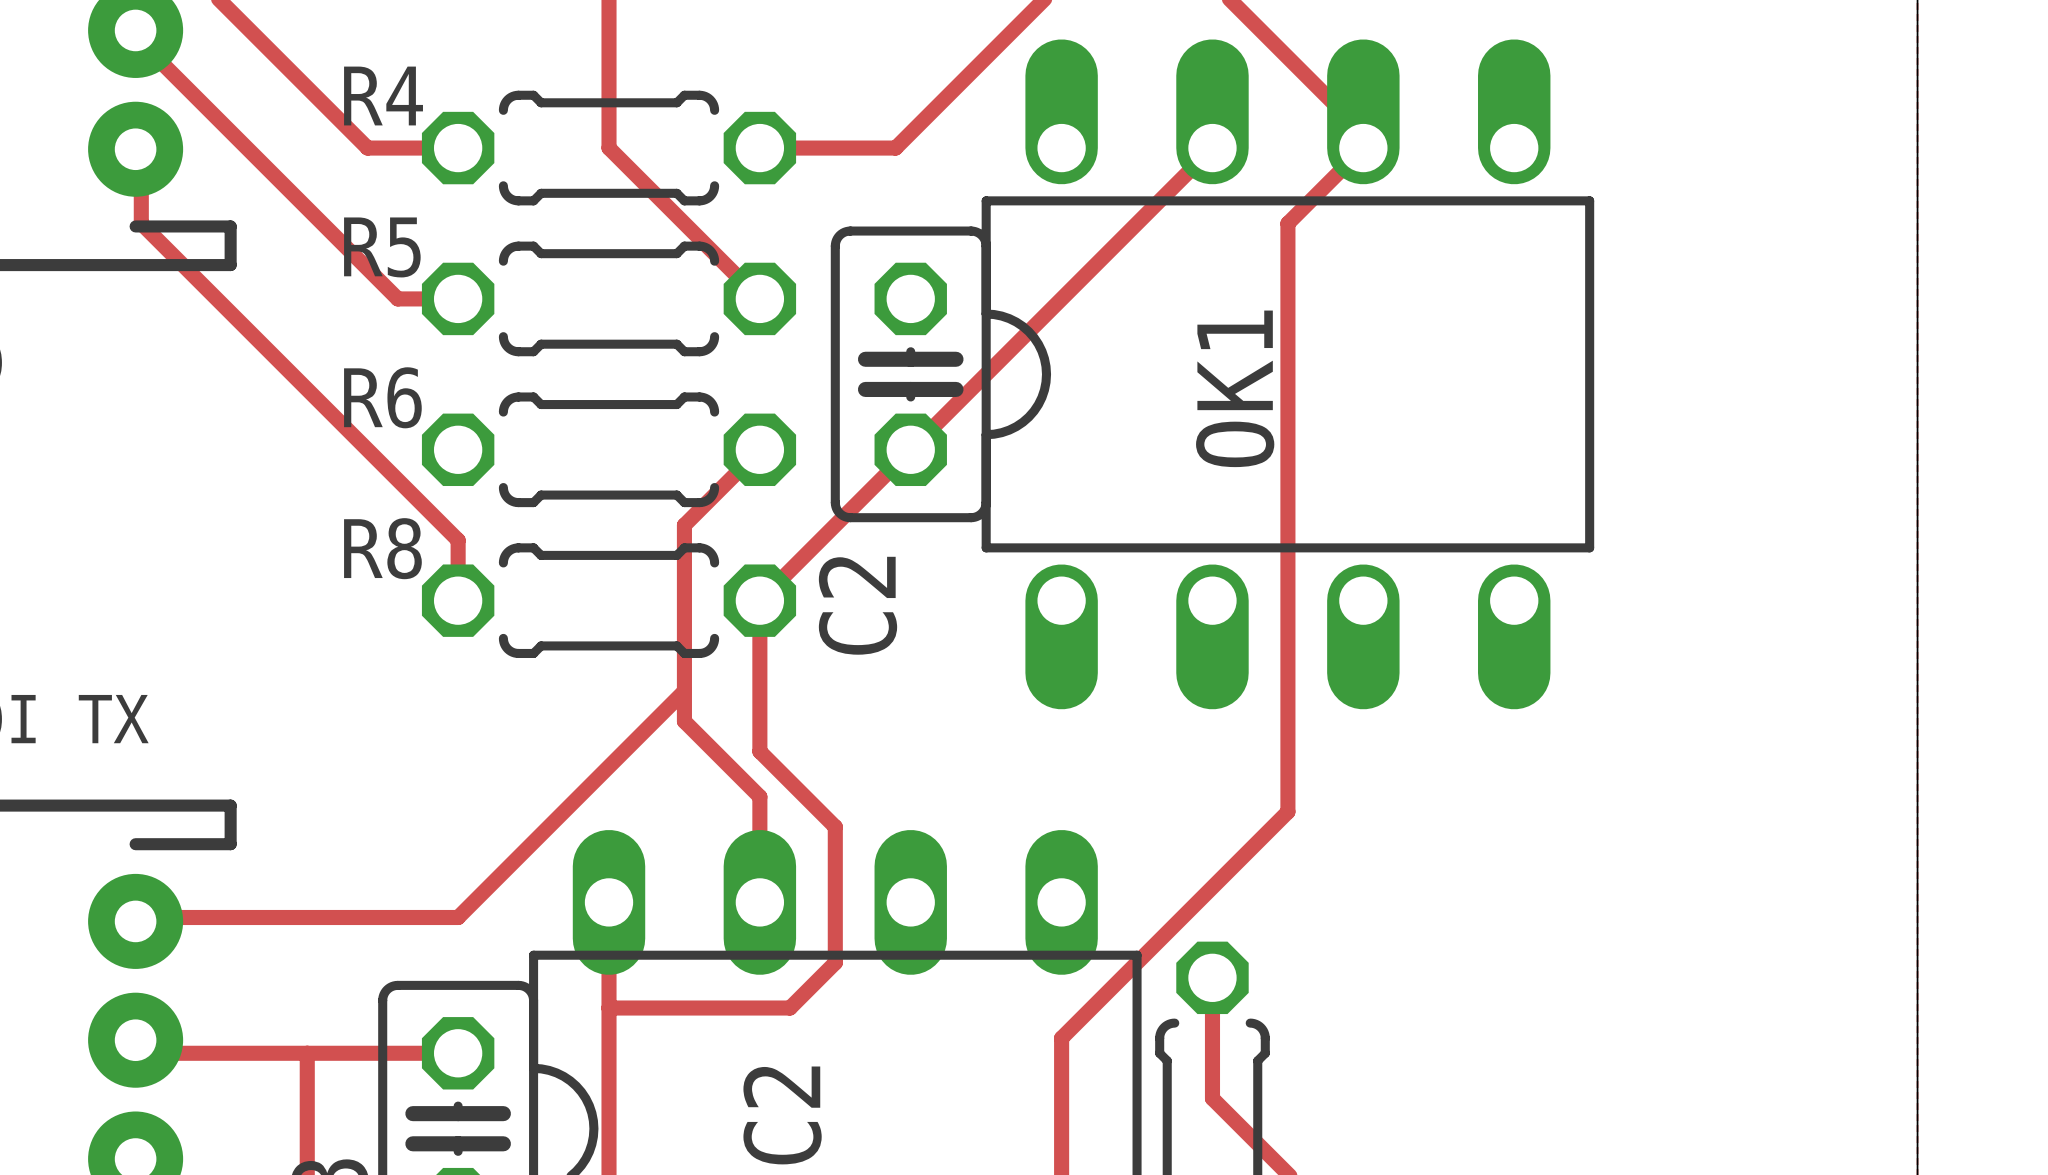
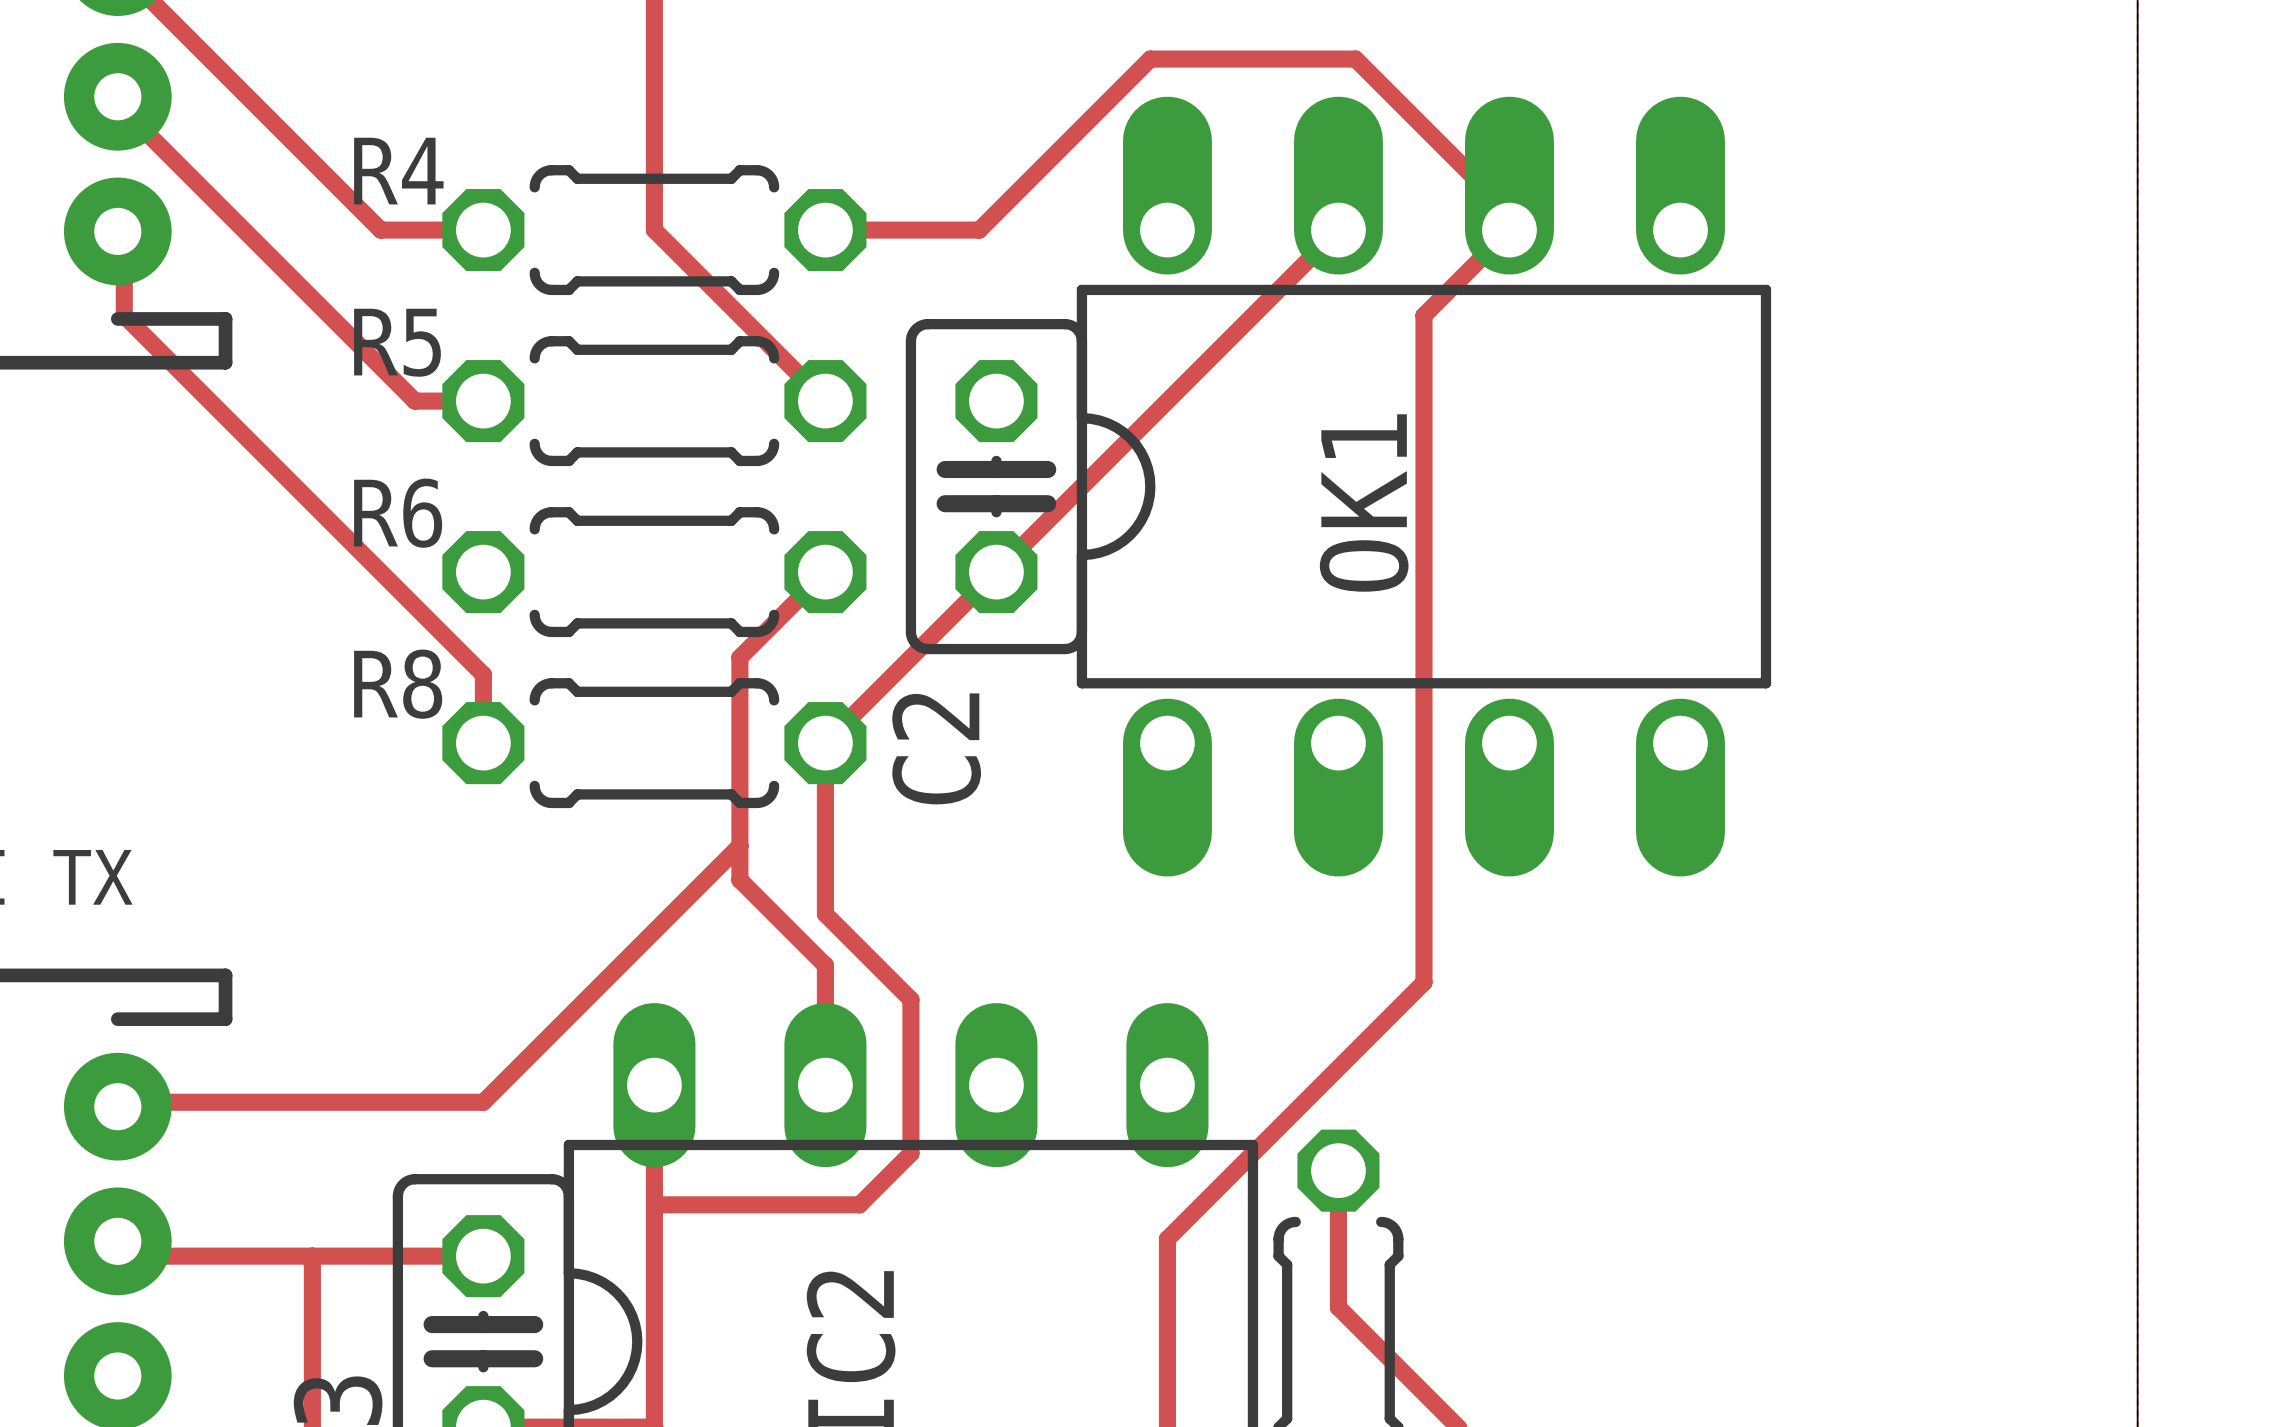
OK1 footprint: [981, 39, 1595, 710] -> [1076, 96, 1772, 877]

